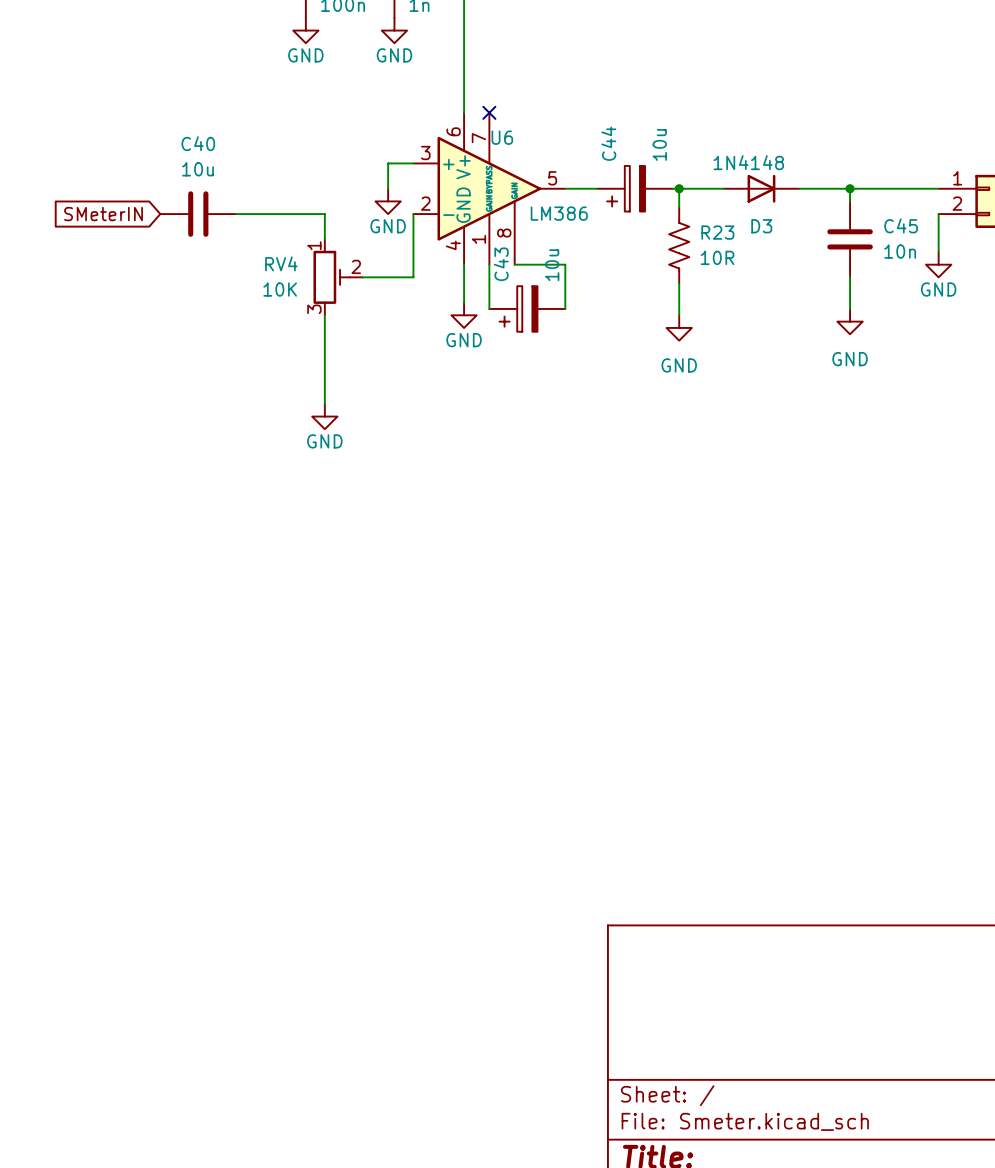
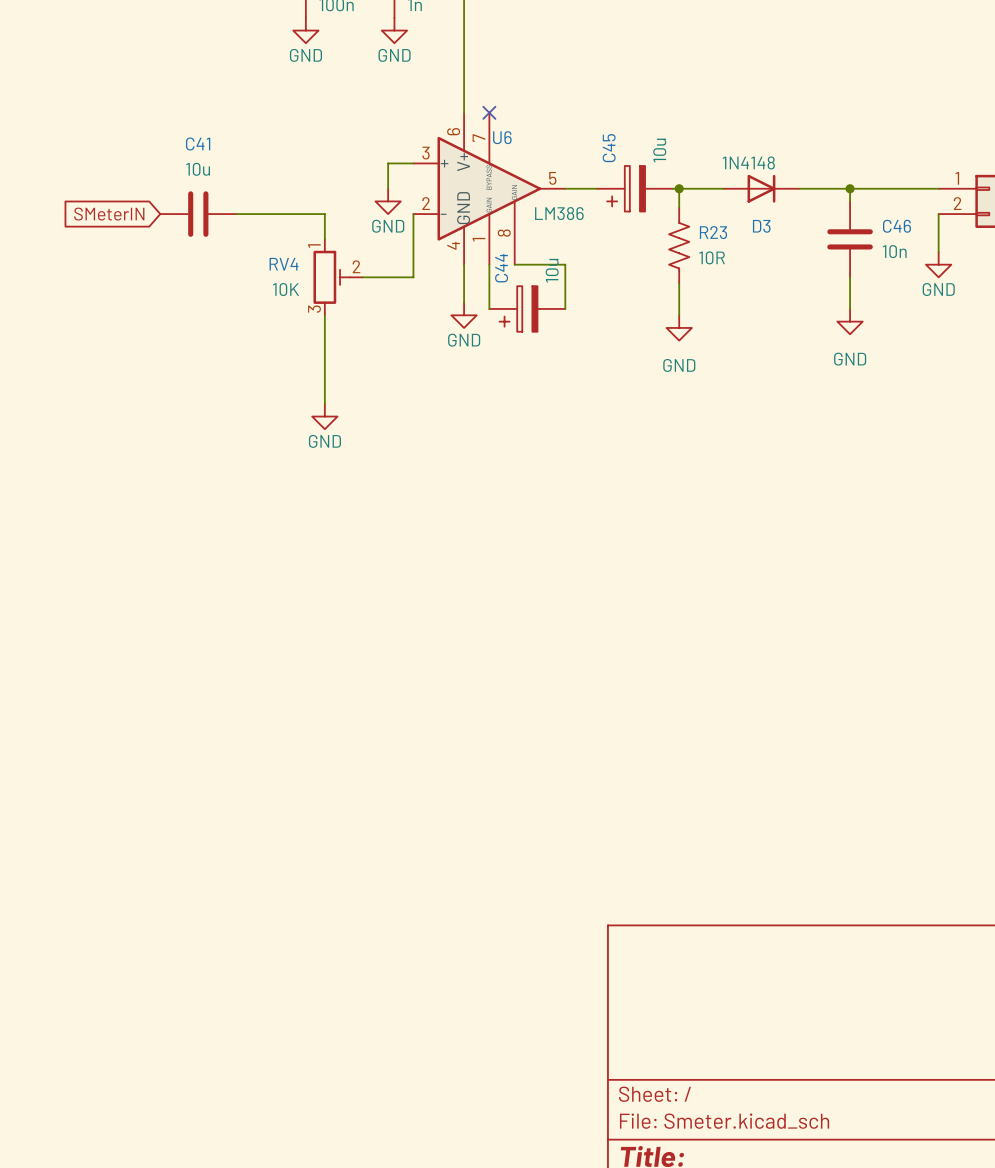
C40 name: C40 (198, 143) -> C41 (198, 143)
C44 name: C44 (608, 143) -> C45 (609, 148)
C45 name: C45 (901, 225) -> C46 (897, 226)
C43 name: C43 (501, 264) -> C44 (501, 268)

